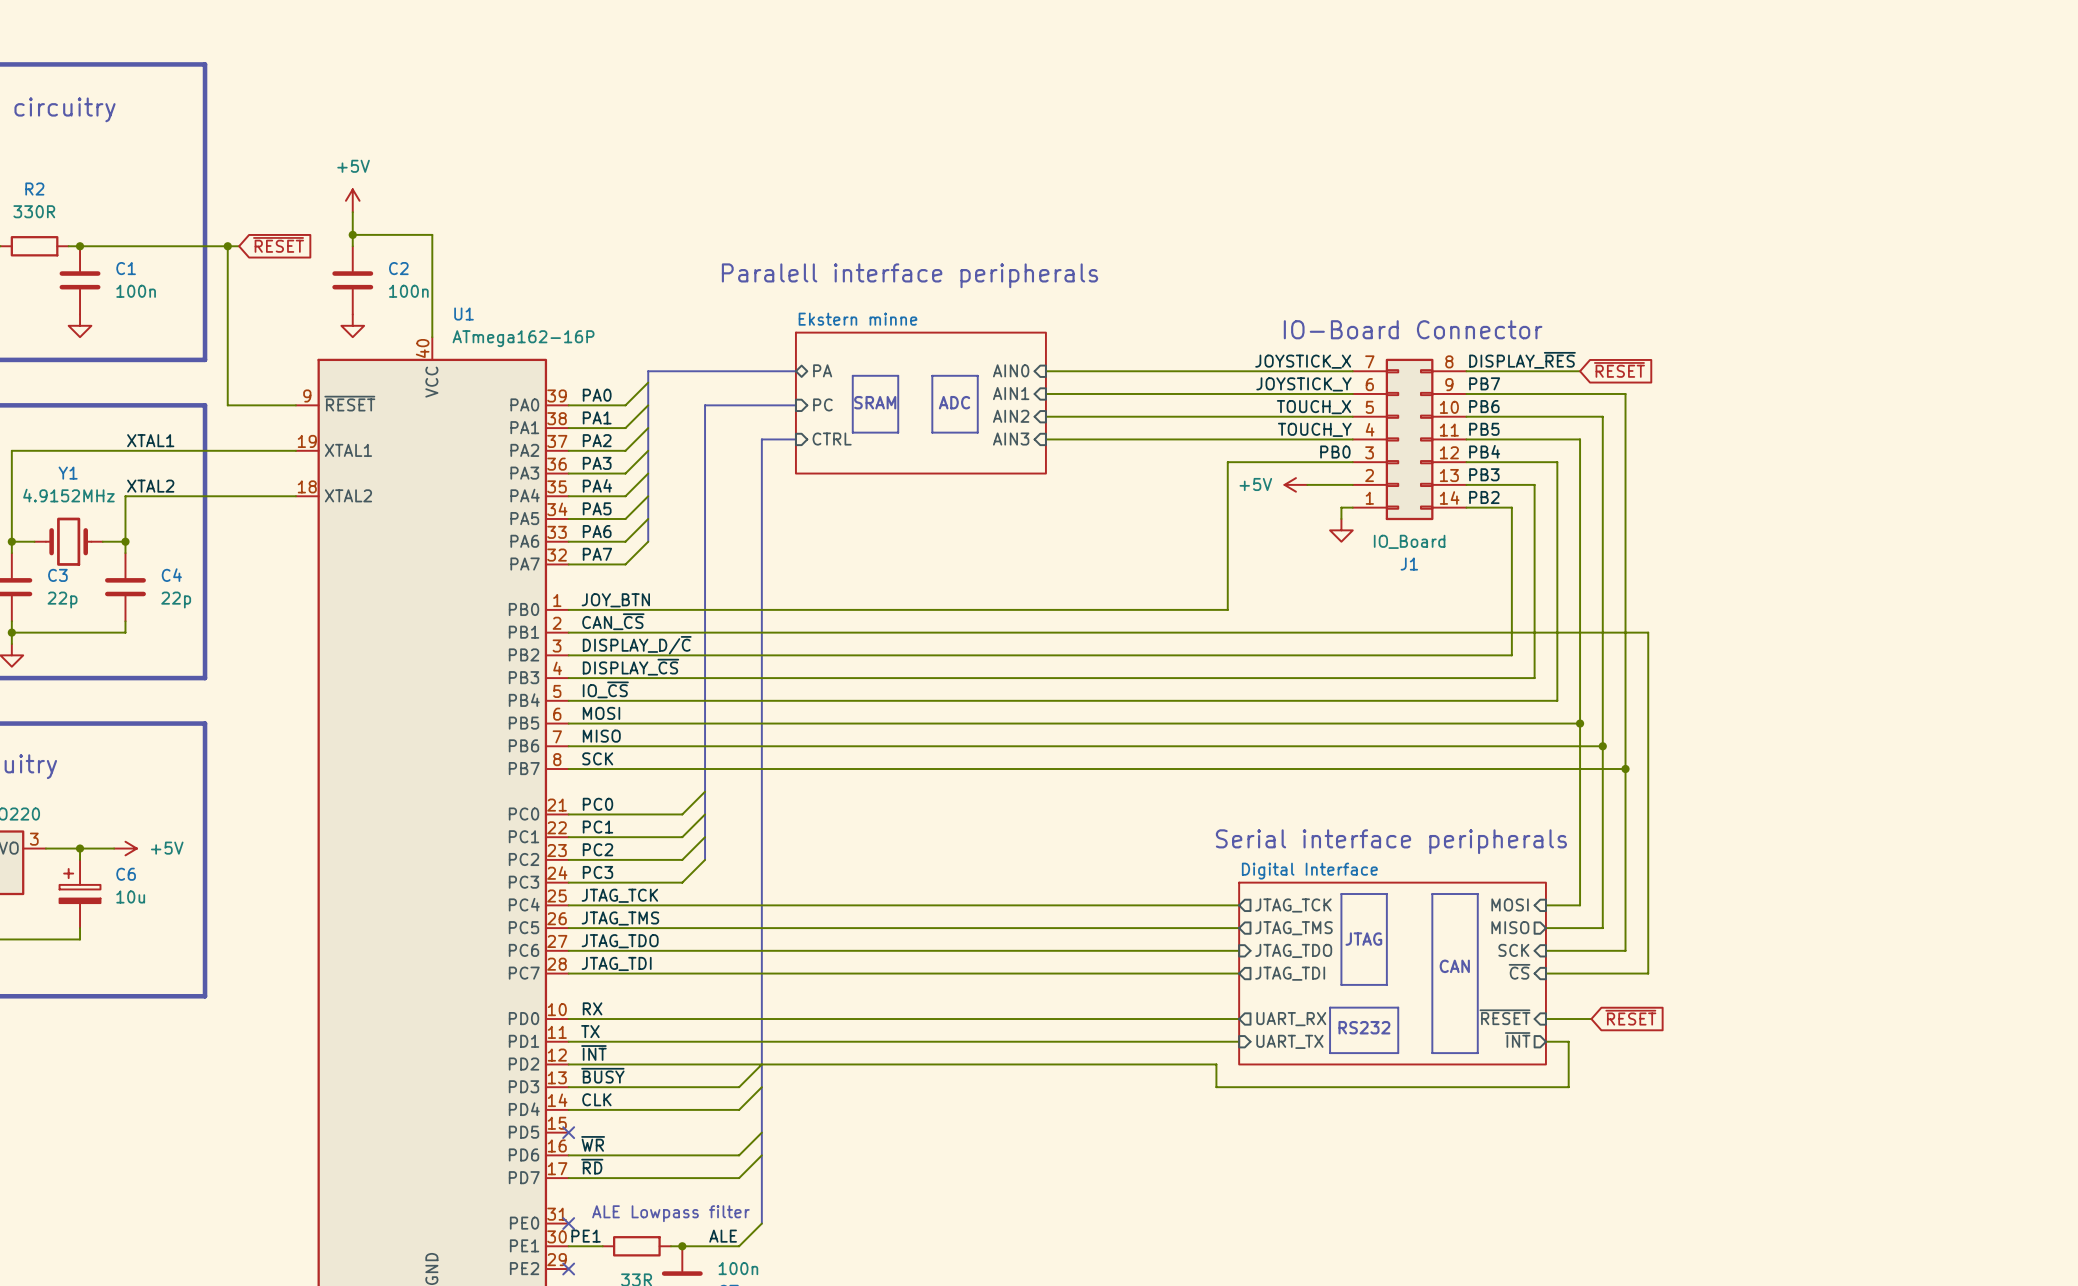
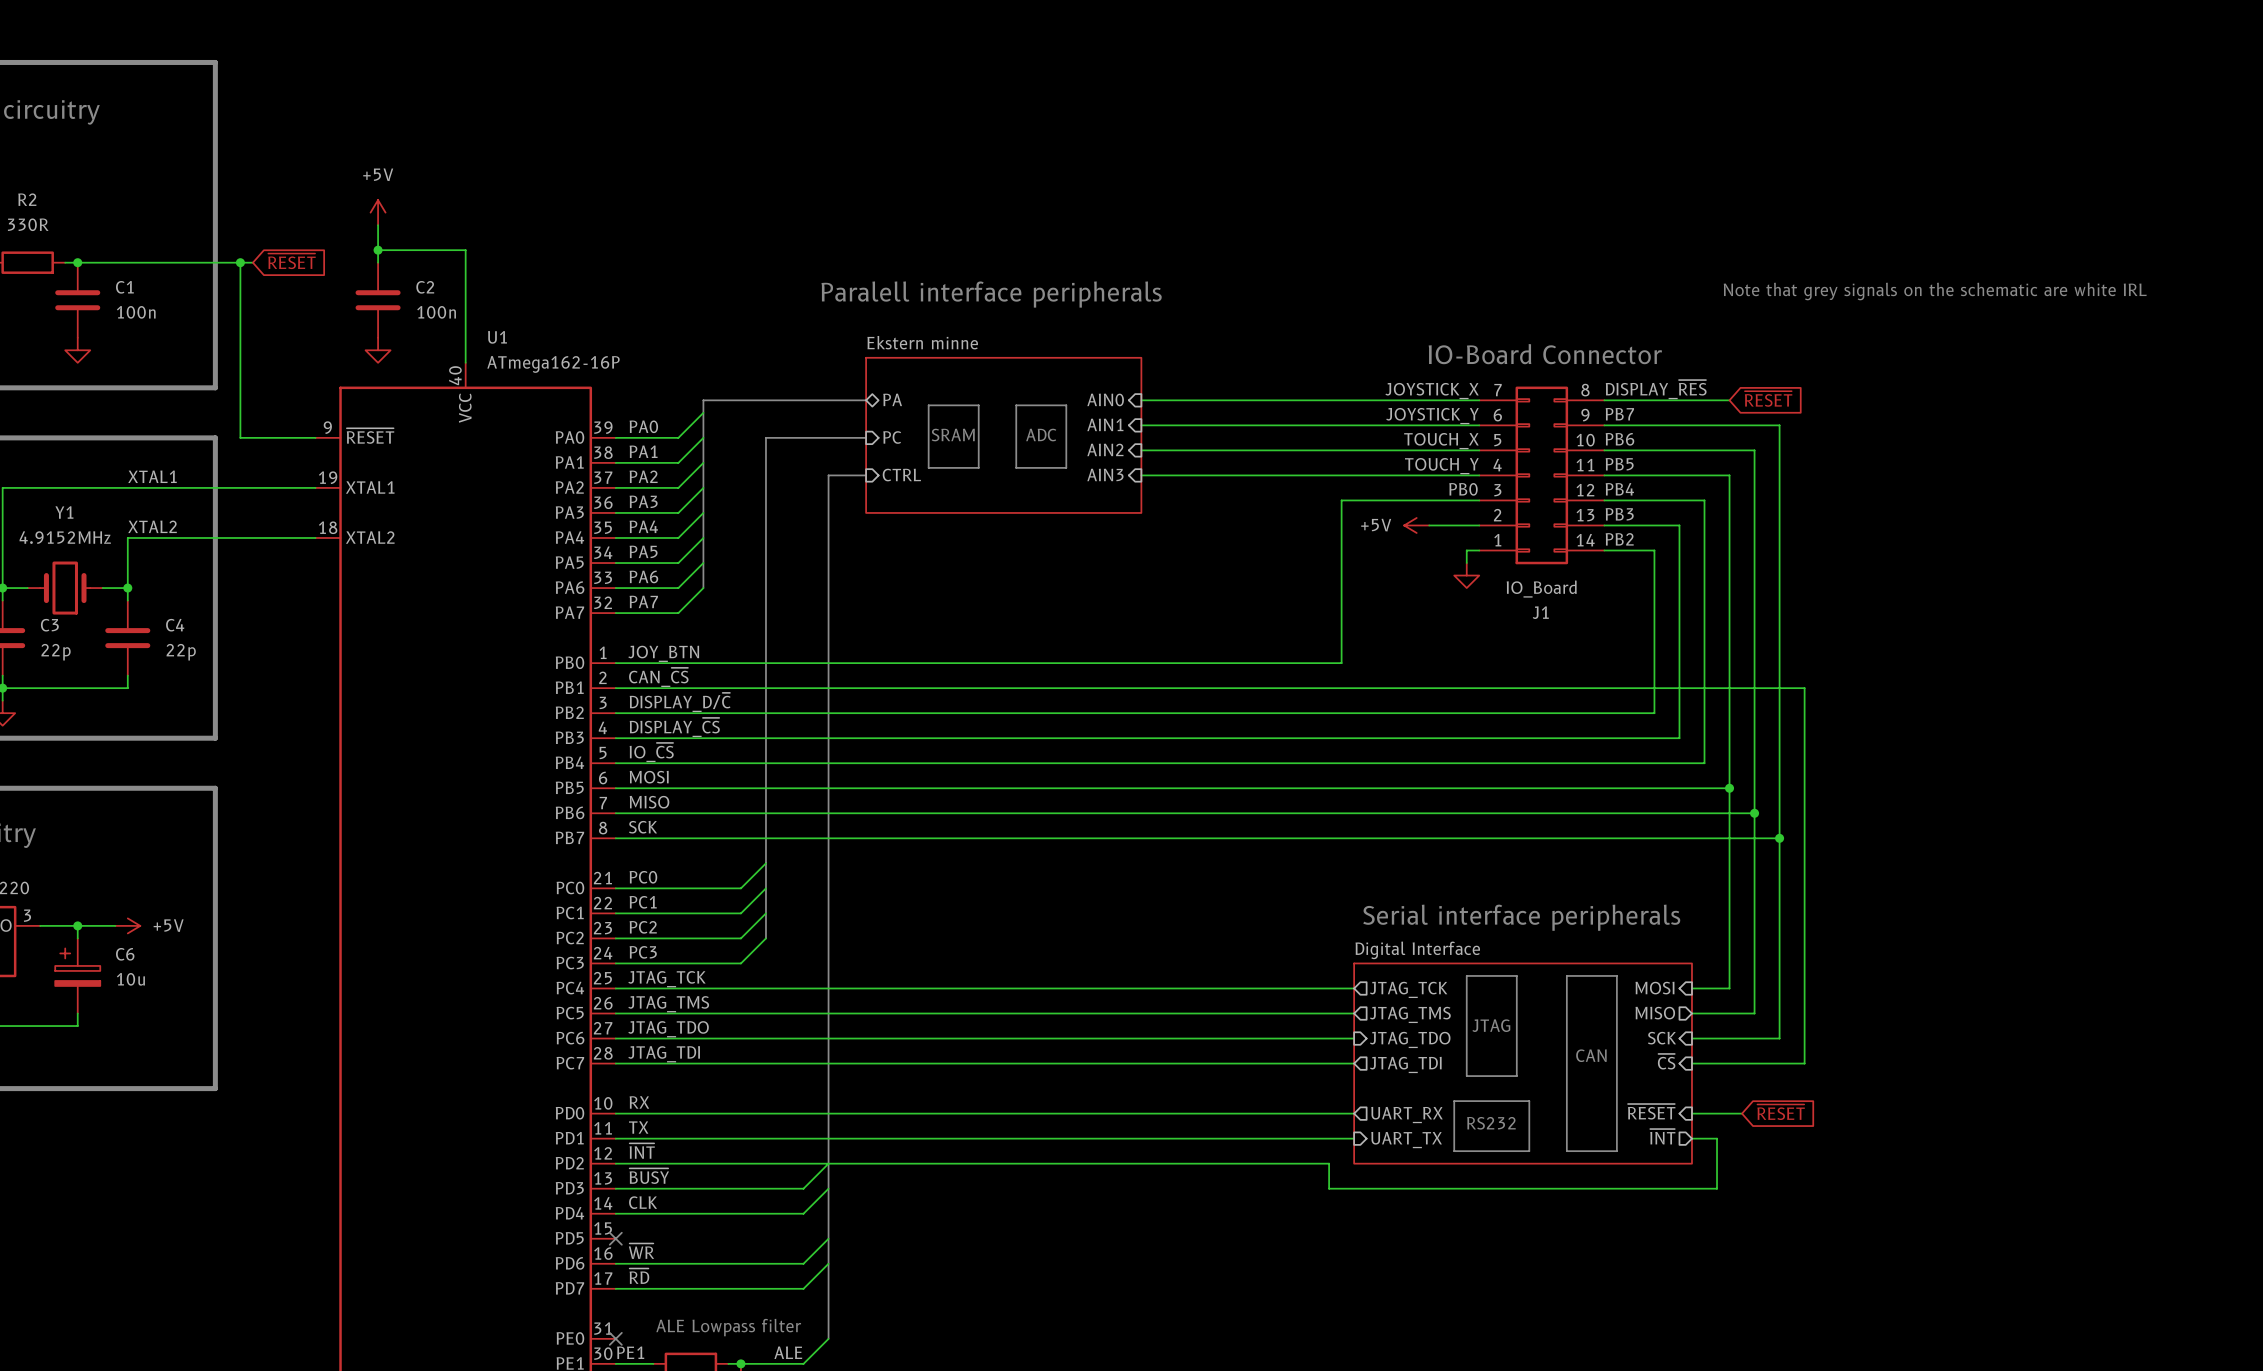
text: none -> Note that grey signals on the schematic are white IRL (1935, 291)

